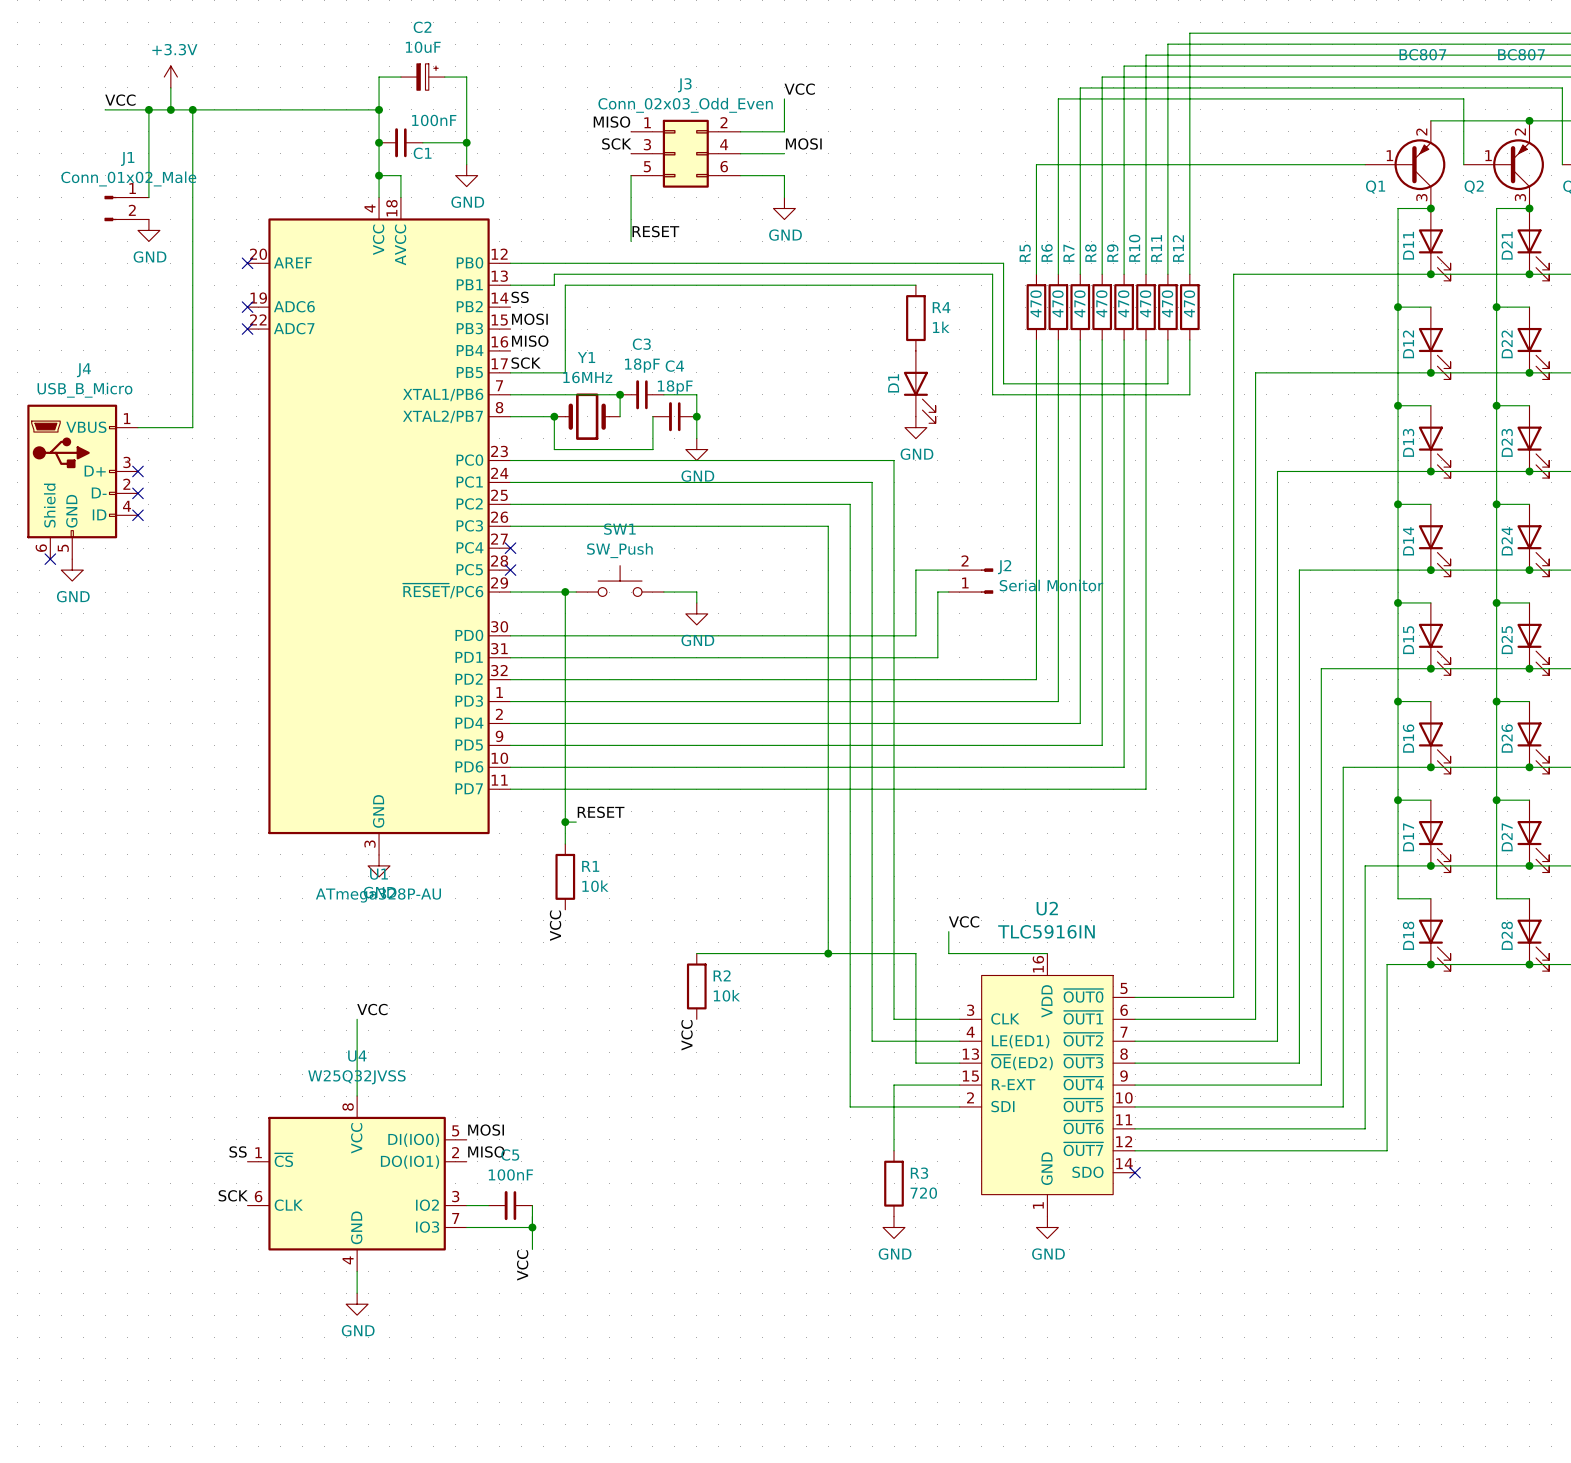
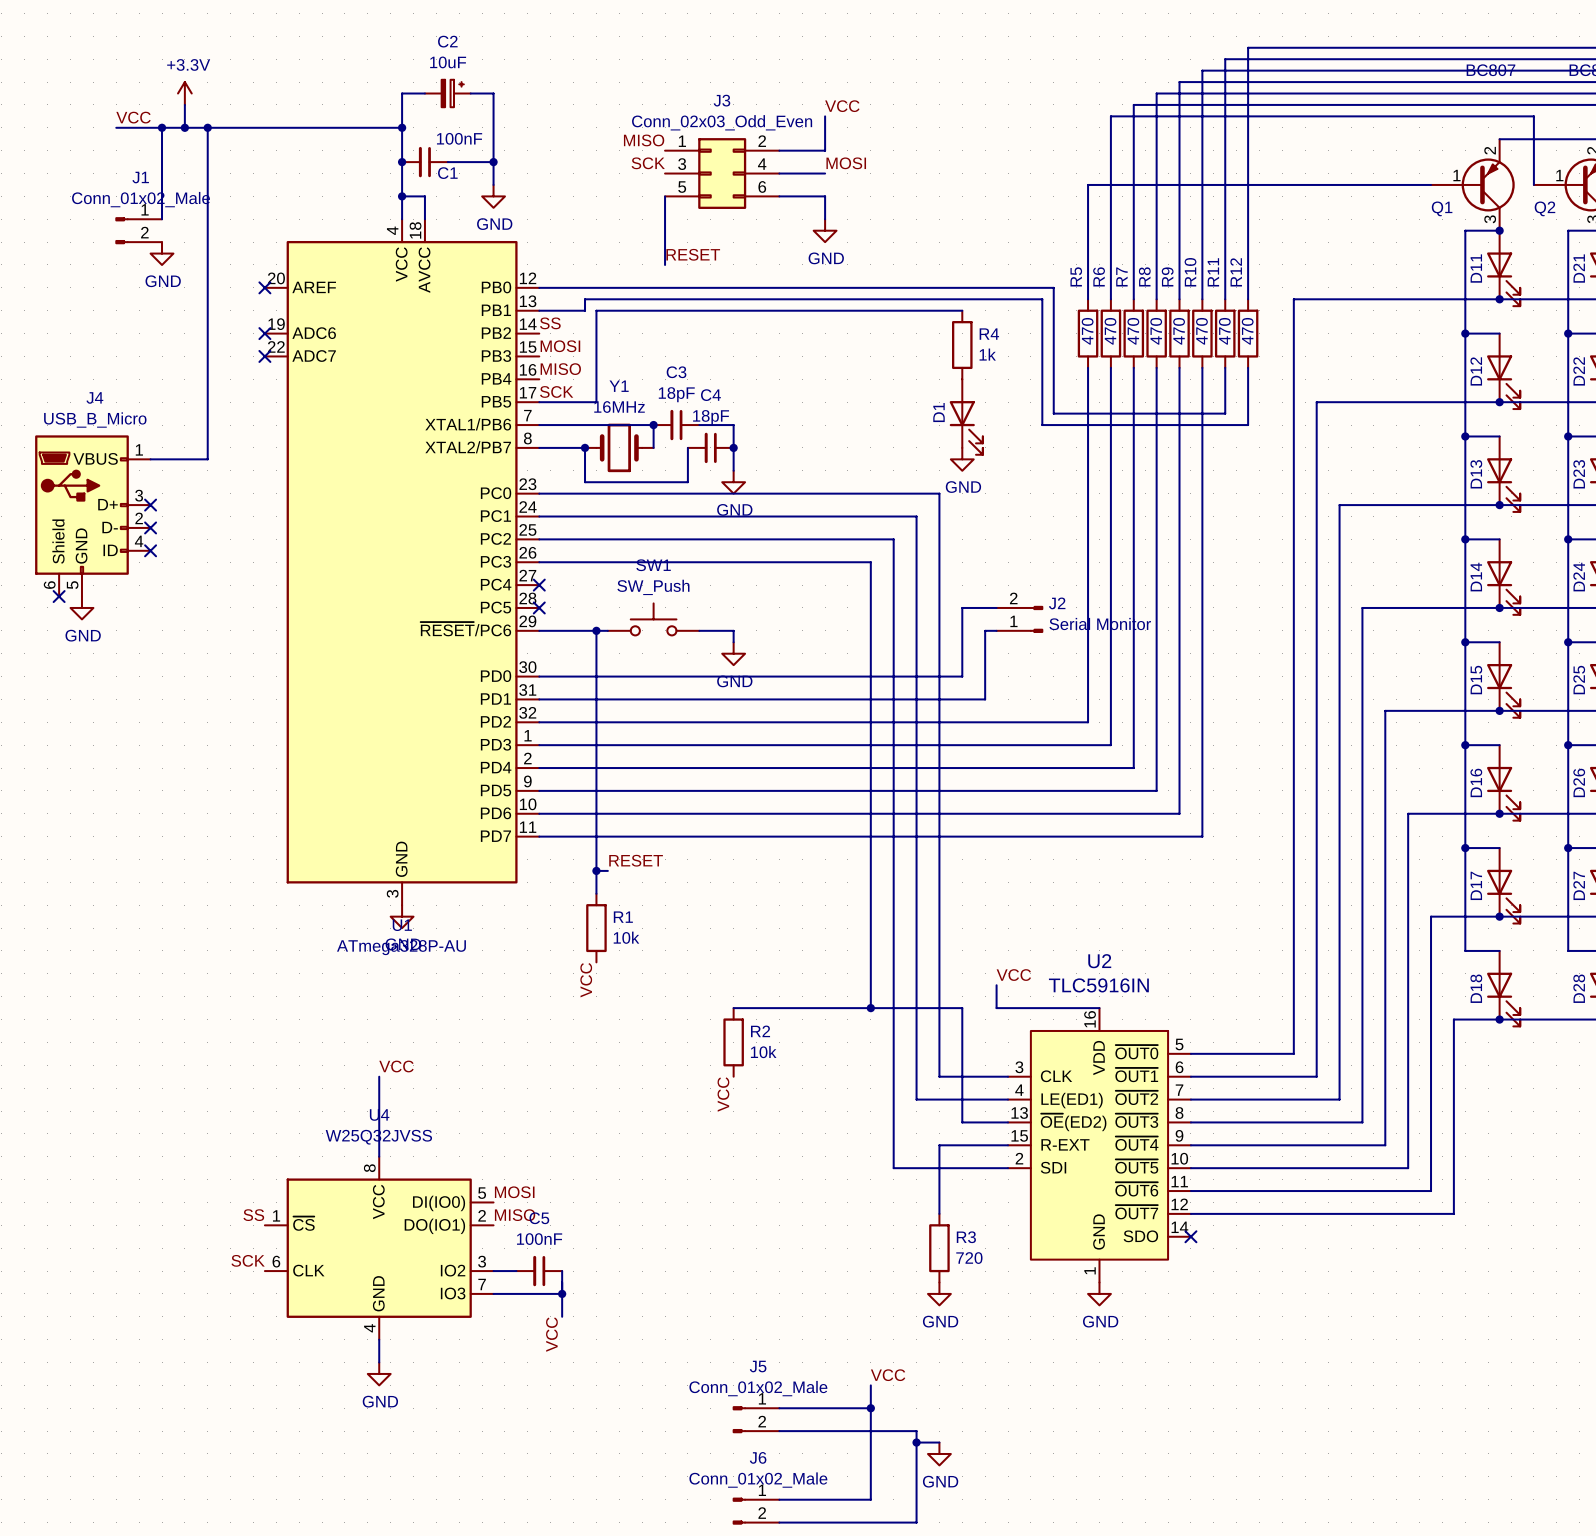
label: none -> VCC (888, 1375)
wire: none -> (870, 1385) (870, 1499) (779, 1499)
wire: none -> (779, 1408) (870, 1408)
junction: none -> (870, 1408)
J5: none -> Conn_01x02_Male (756, 1419)
wire: none -> (779, 1431) (916, 1431) (916, 1522) (779, 1522)
wire: none -> (916, 1442) (939, 1442)
junction: none -> (916, 1442)
power symbol: none -> GND (939, 1453)
J6: none -> Conn_01x02_Male (756, 1511)

